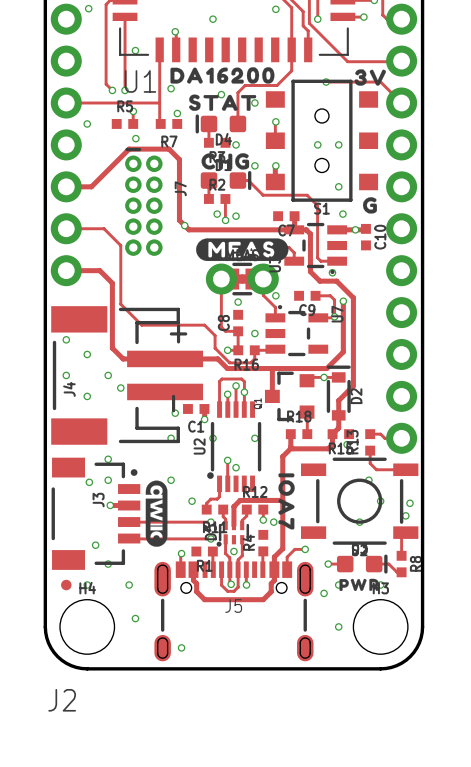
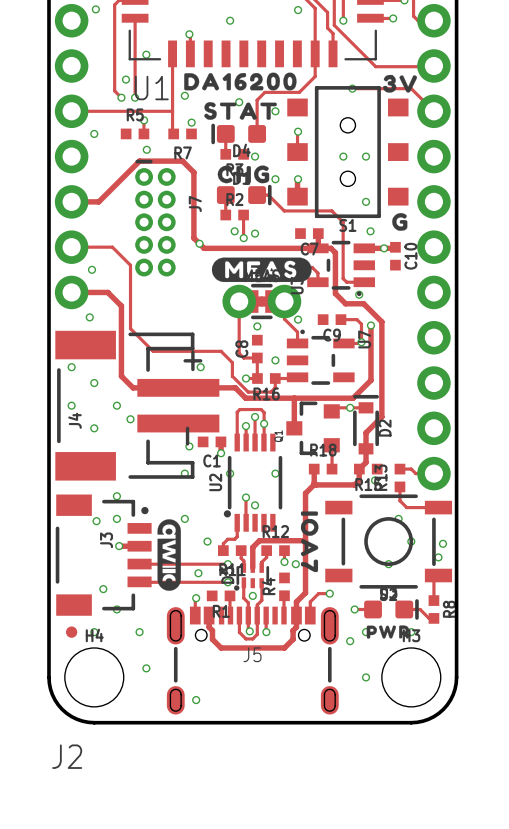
via: none -> (125, 79)
via: none -> (92, 269)
via: none -> (89, 317)
via: none -> (200, 367)
via: none -> (198, 573)

